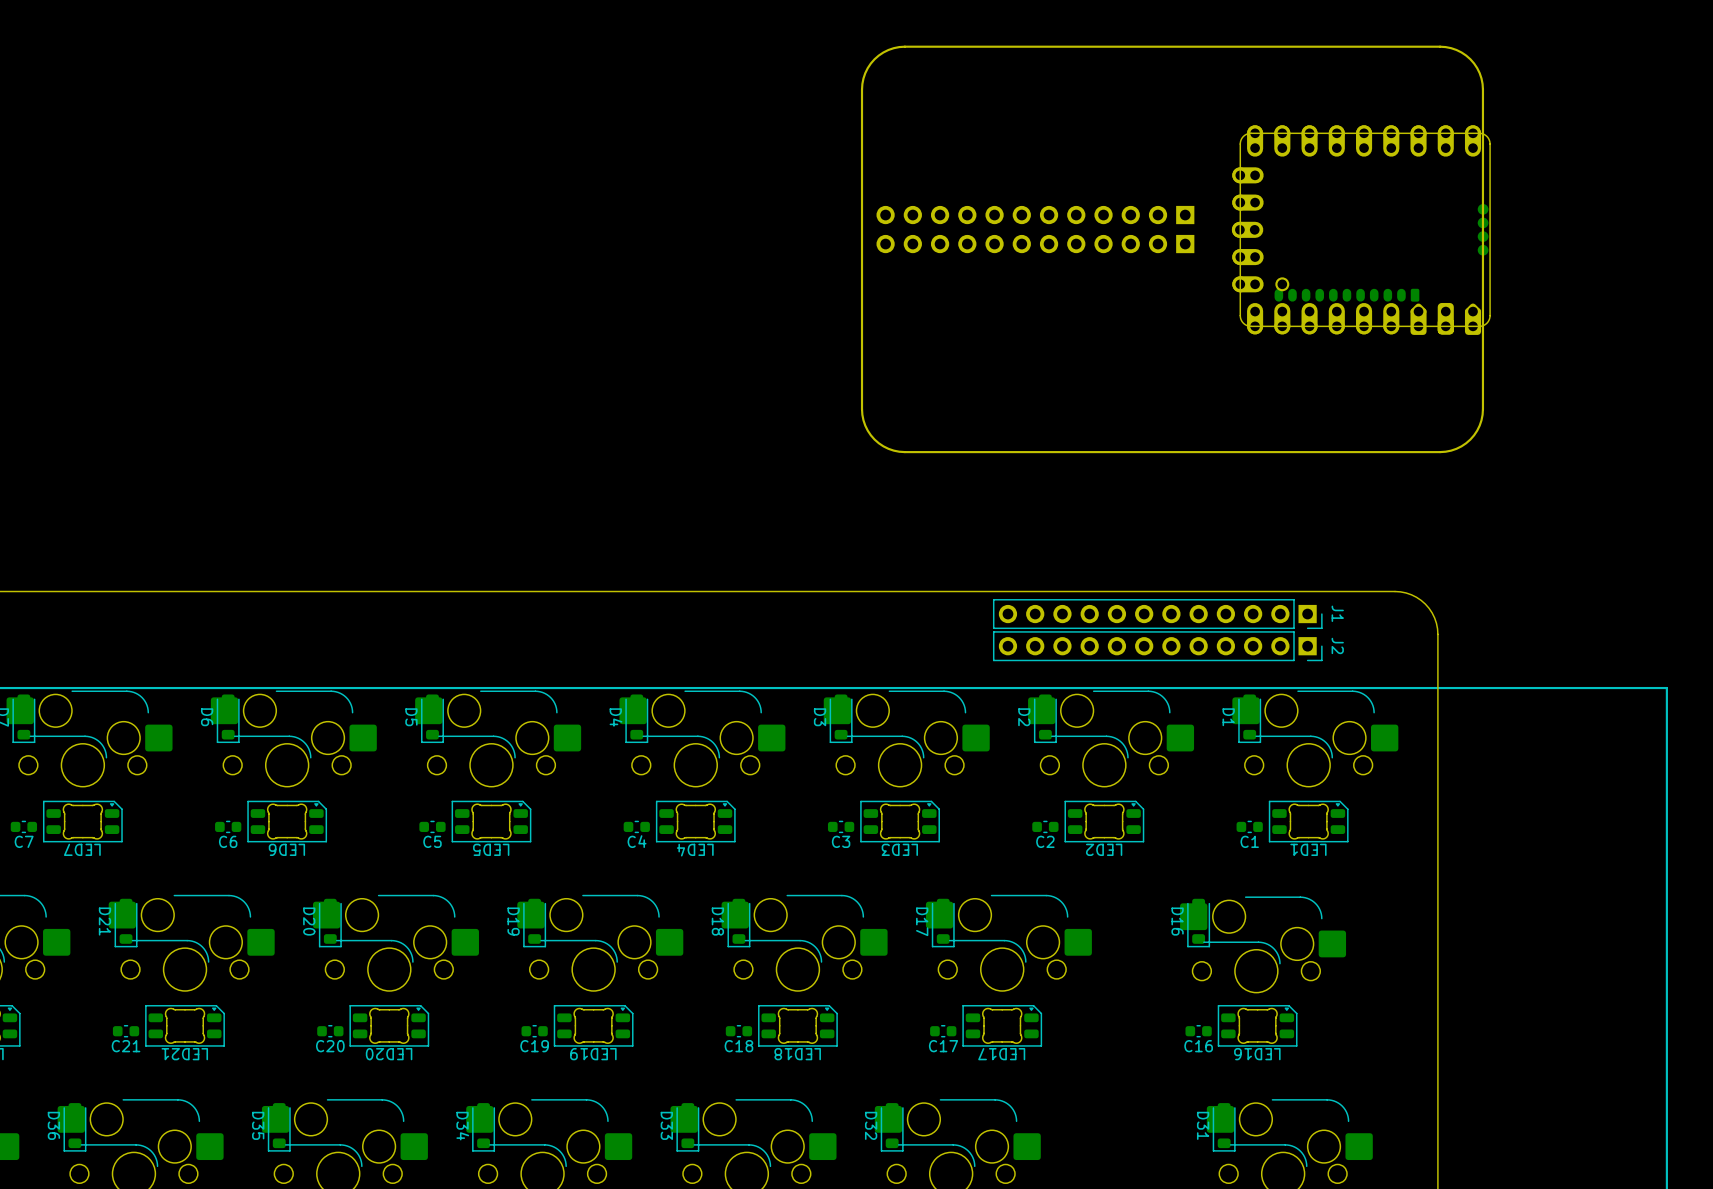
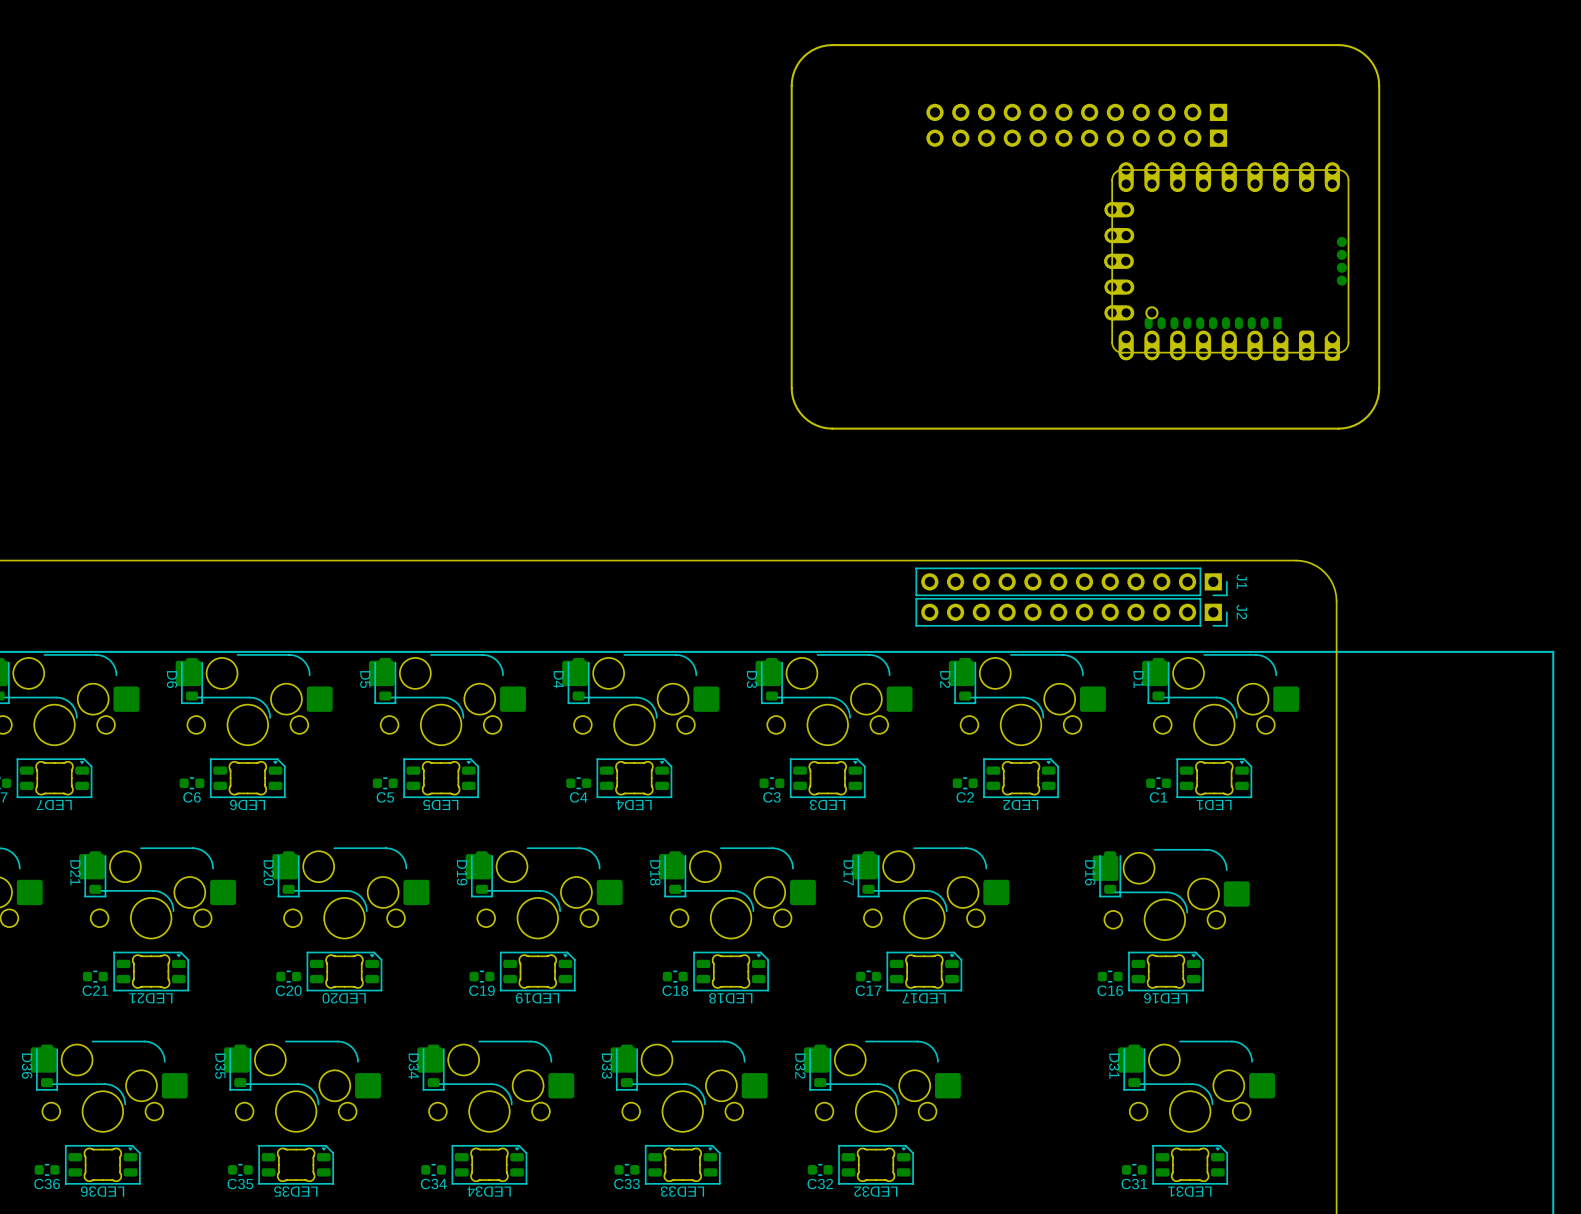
part: none -> (1076, 112)
part: none -> (1076, 138)
part: (1035, 215) -> none
part position: (1361, 230) -> (1226, 261)
part: (1035, 244) -> none

